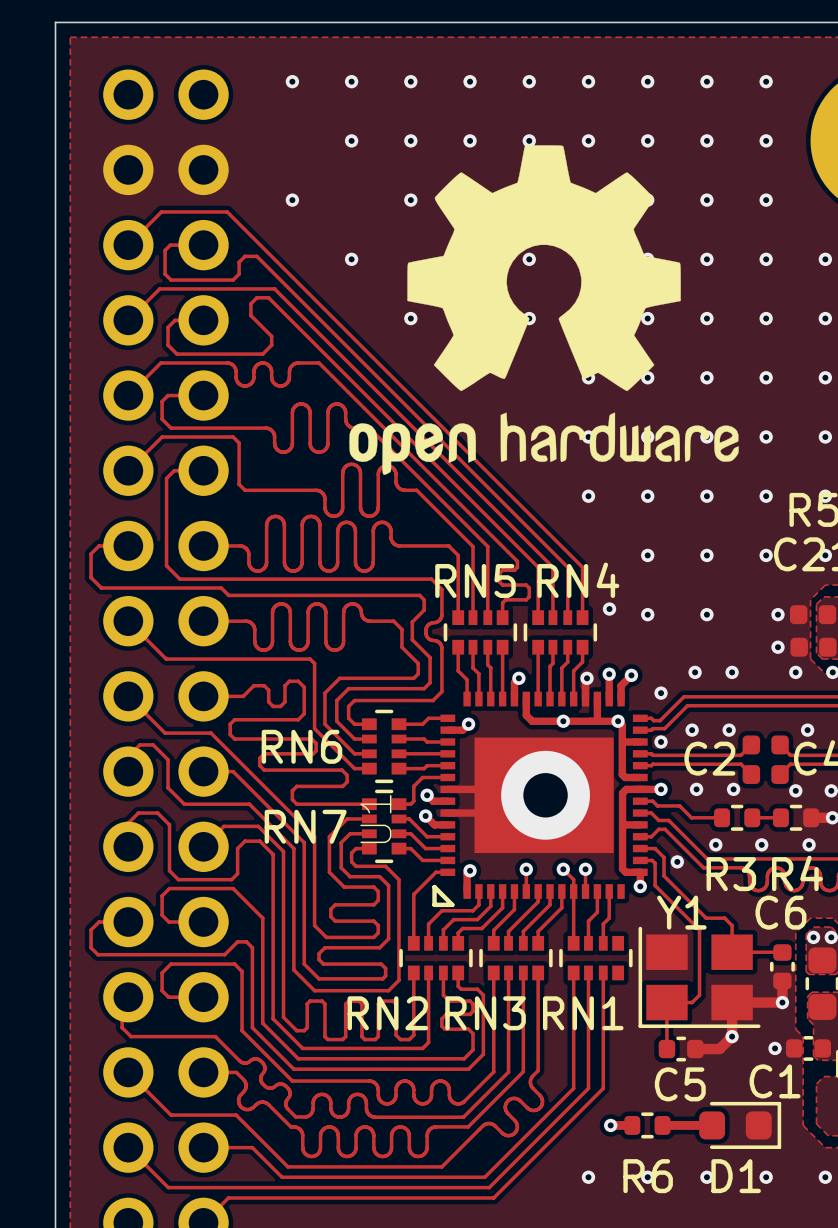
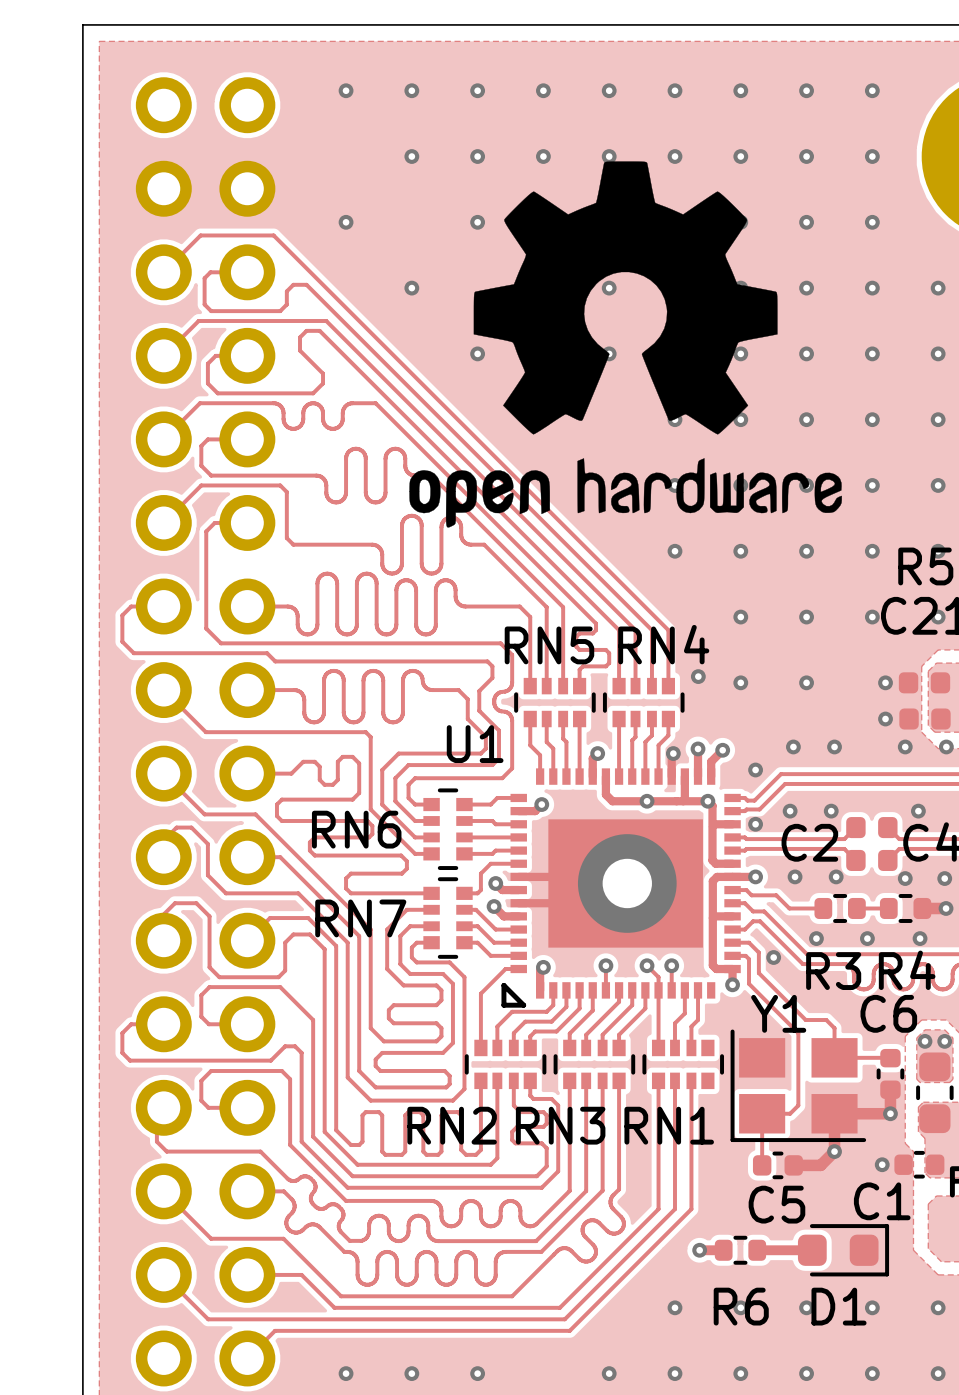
U1 name rotation: 0° (375, 819) -> 90° clockwise (475, 744)
U1 name position: U1 (375, 819) -> U1 (475, 744)

